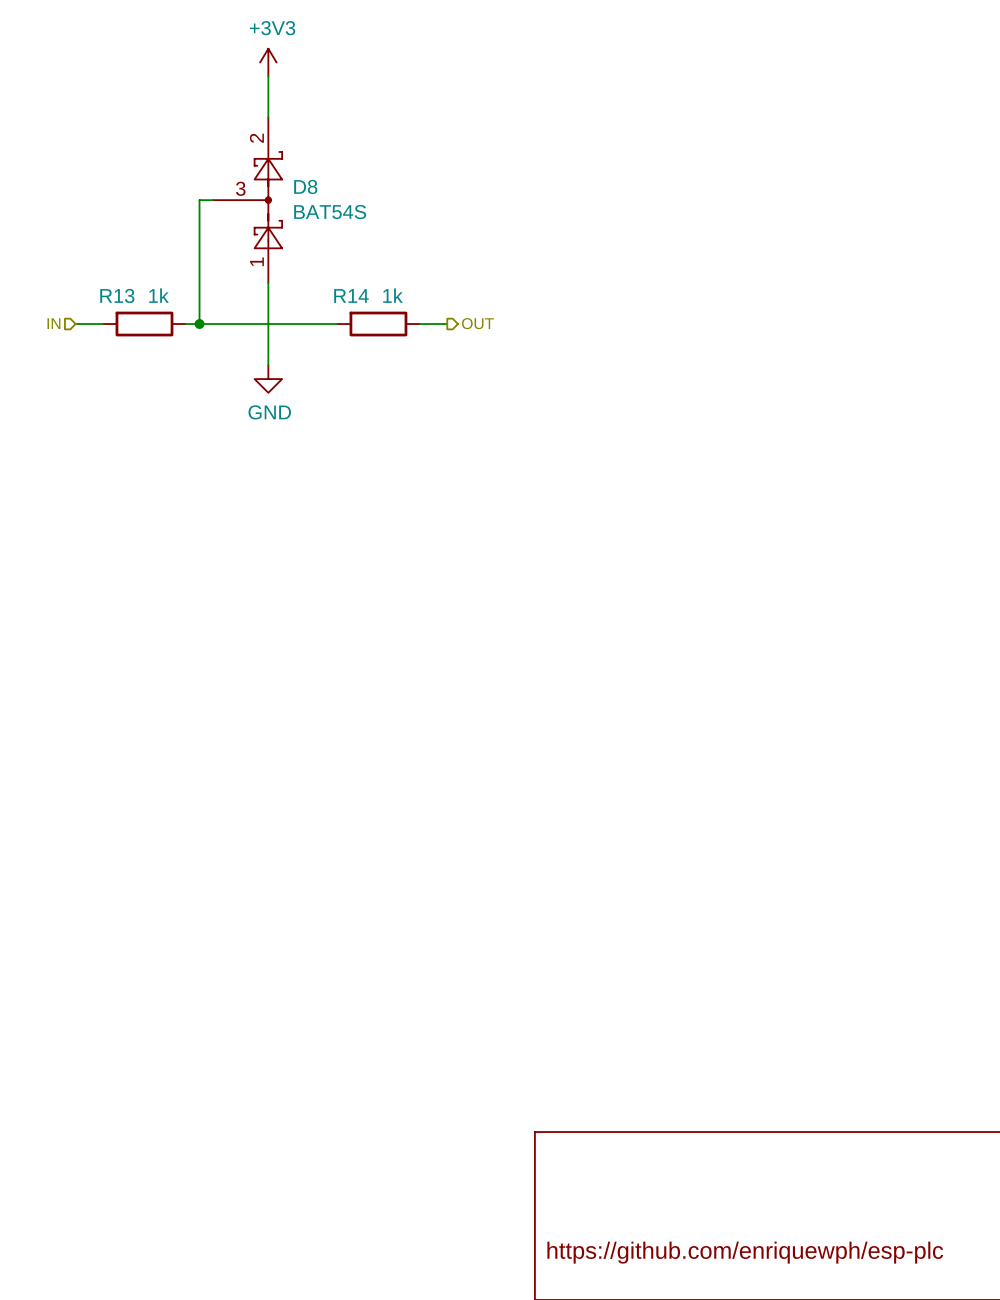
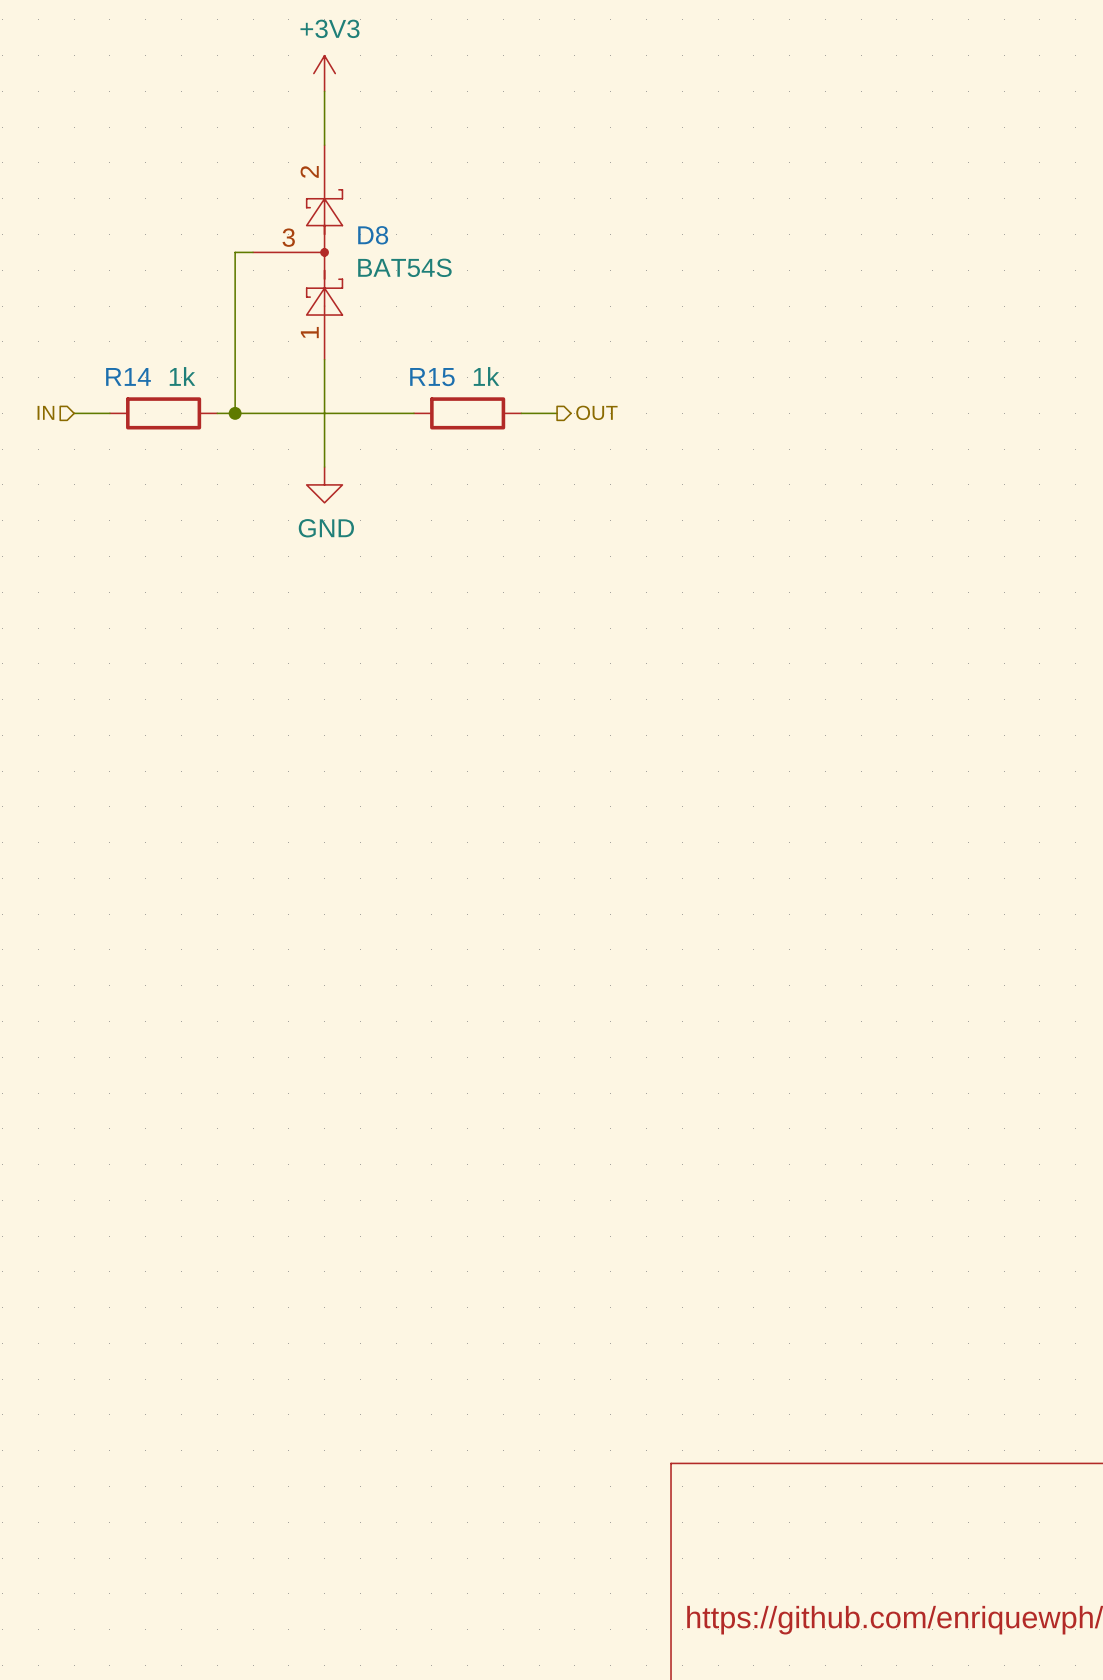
R13 name: R13 (117, 295) -> R14 (128, 376)
R14 name: R14 (351, 295) -> R15 (432, 377)

